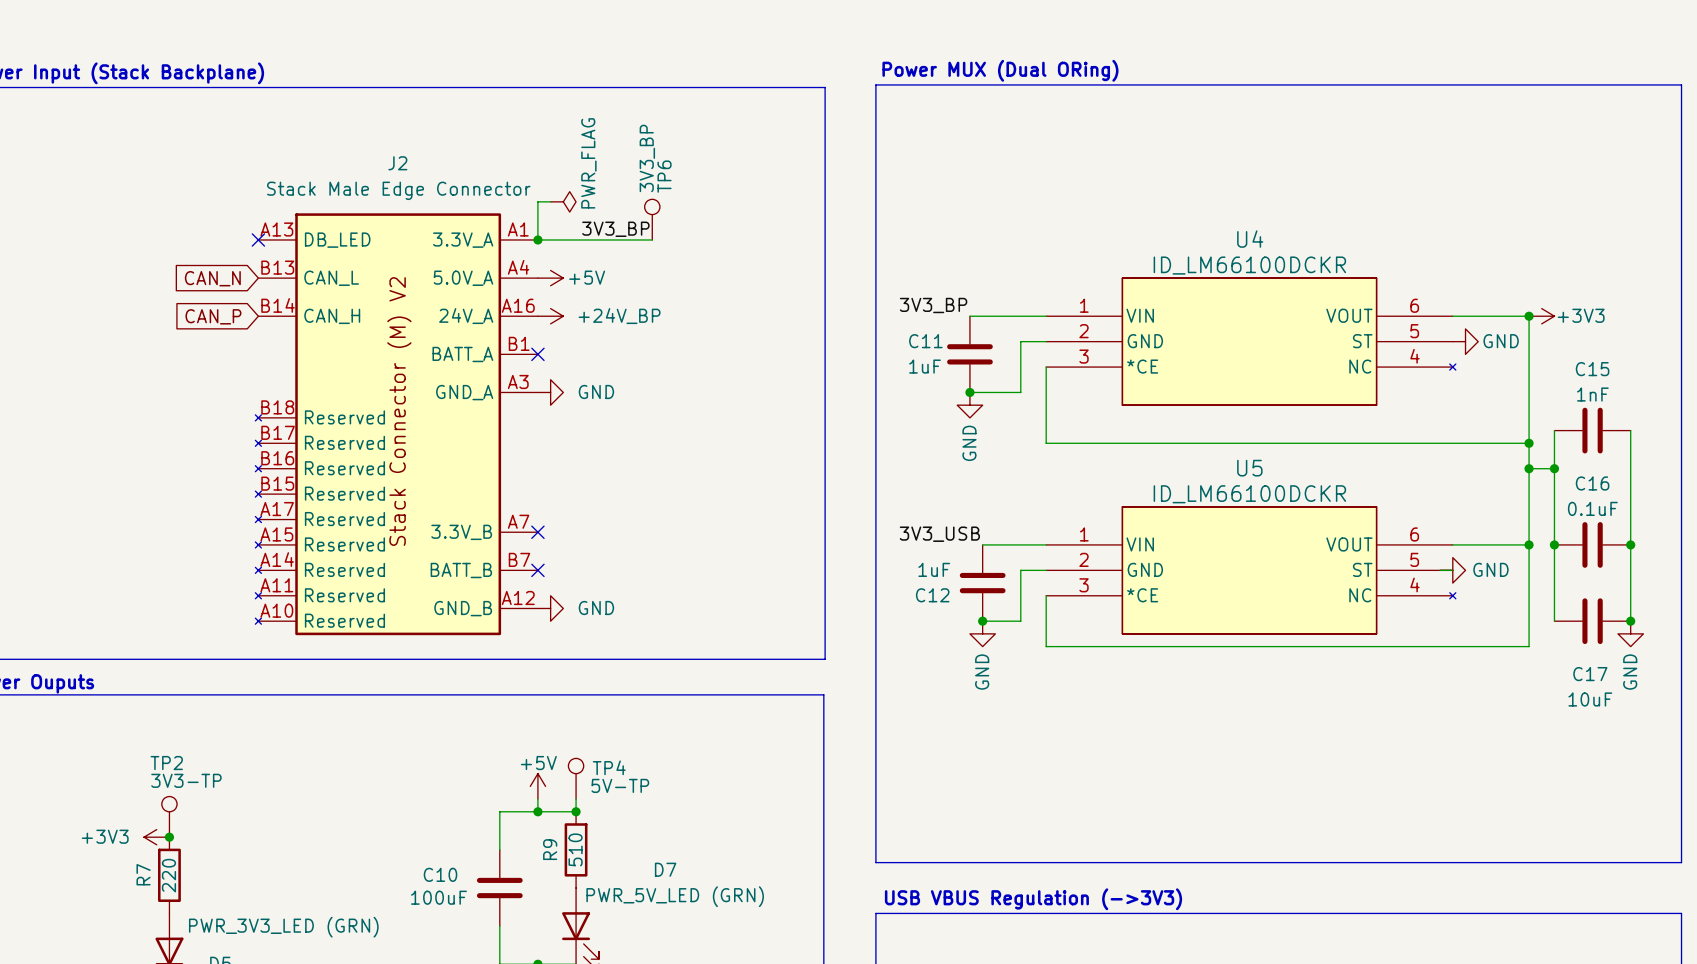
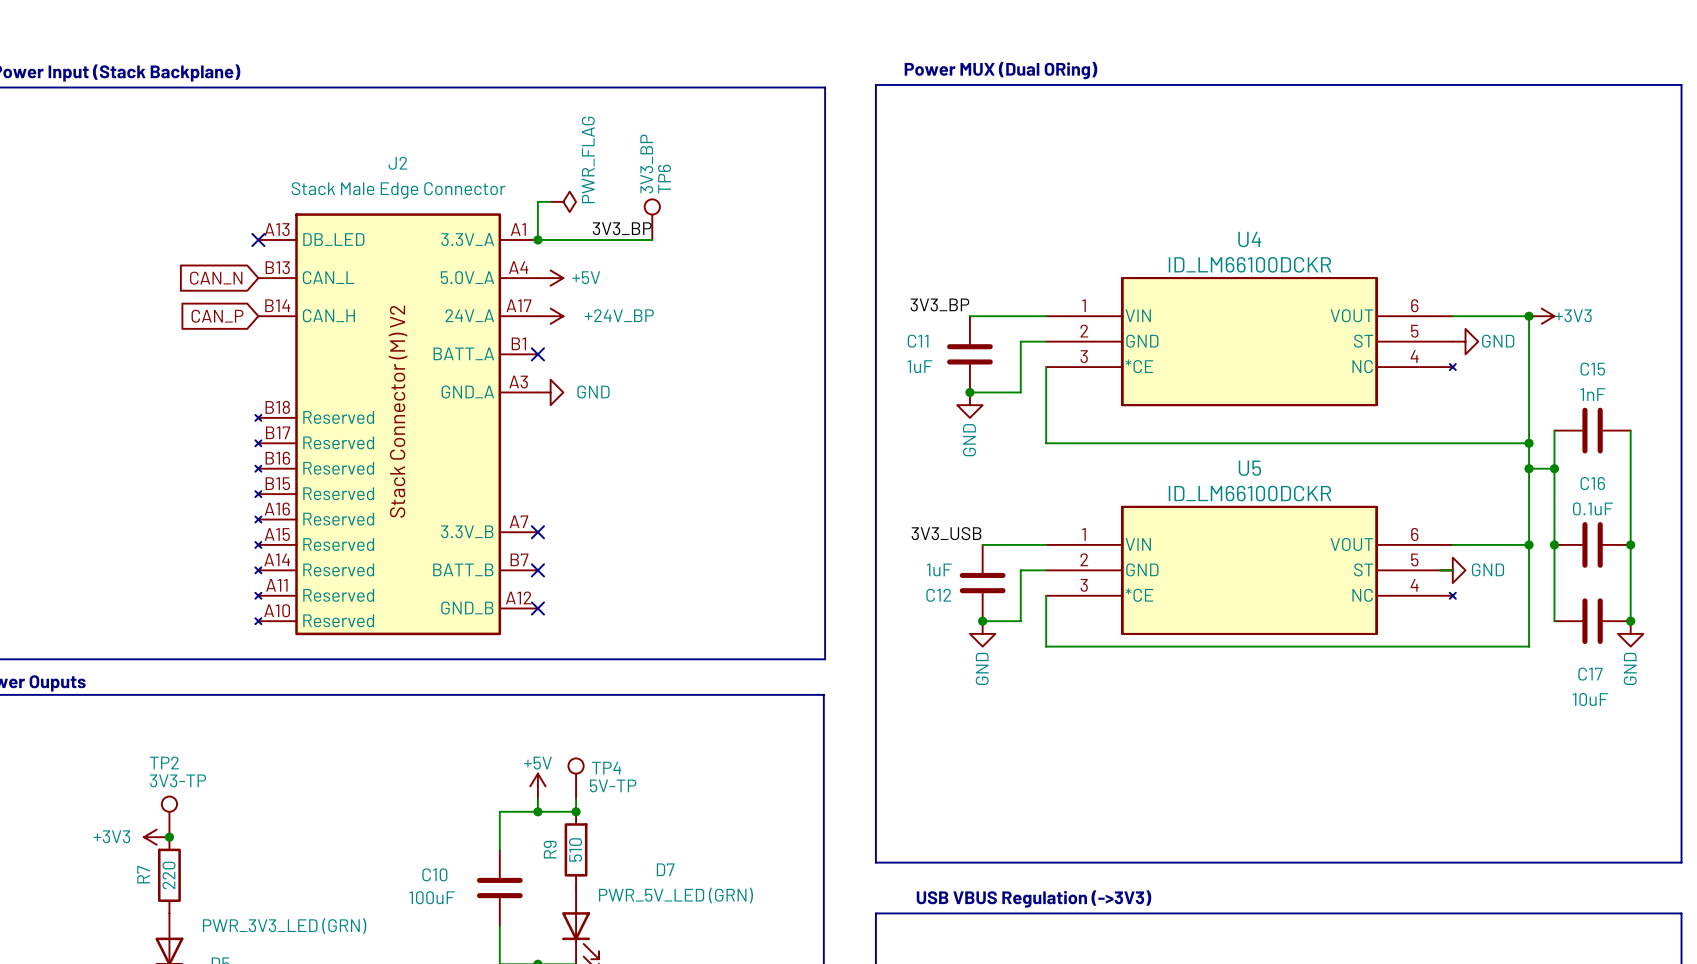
J2 pin number: A16 (518, 305) -> A17 (518, 305)
J2 pin number: A17 (277, 509) -> A16 (277, 509)
no-connect mark: none -> (537, 608)
power symbol: GND (550, 608) -> none

